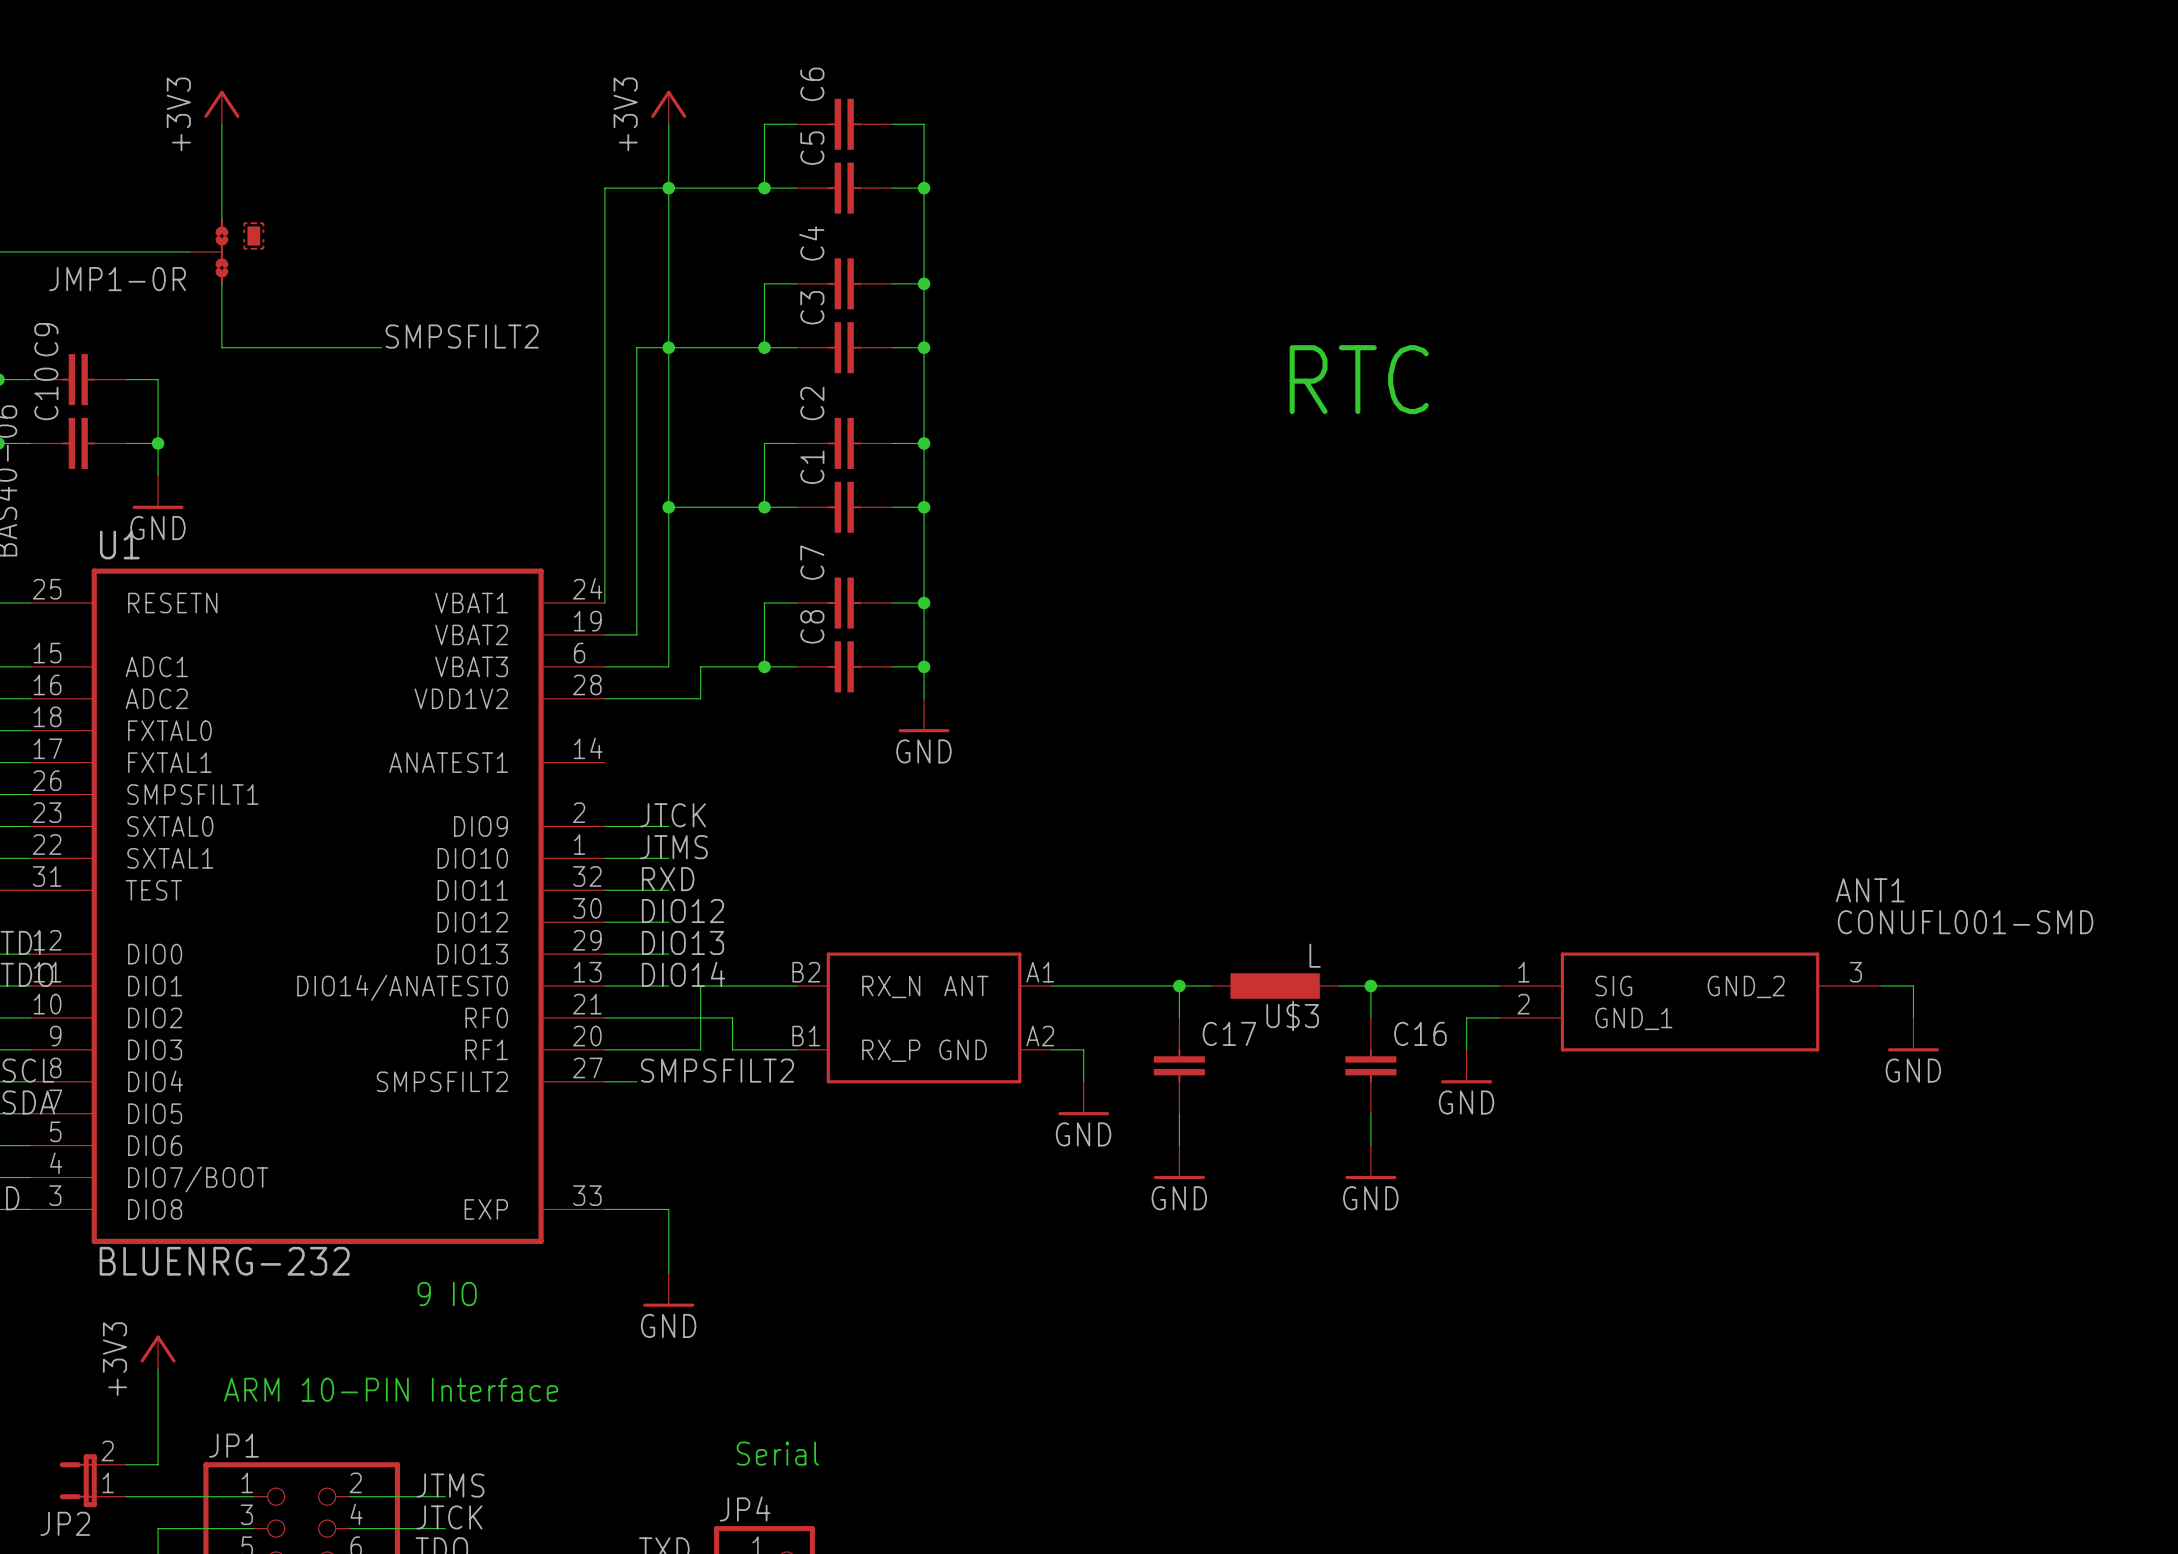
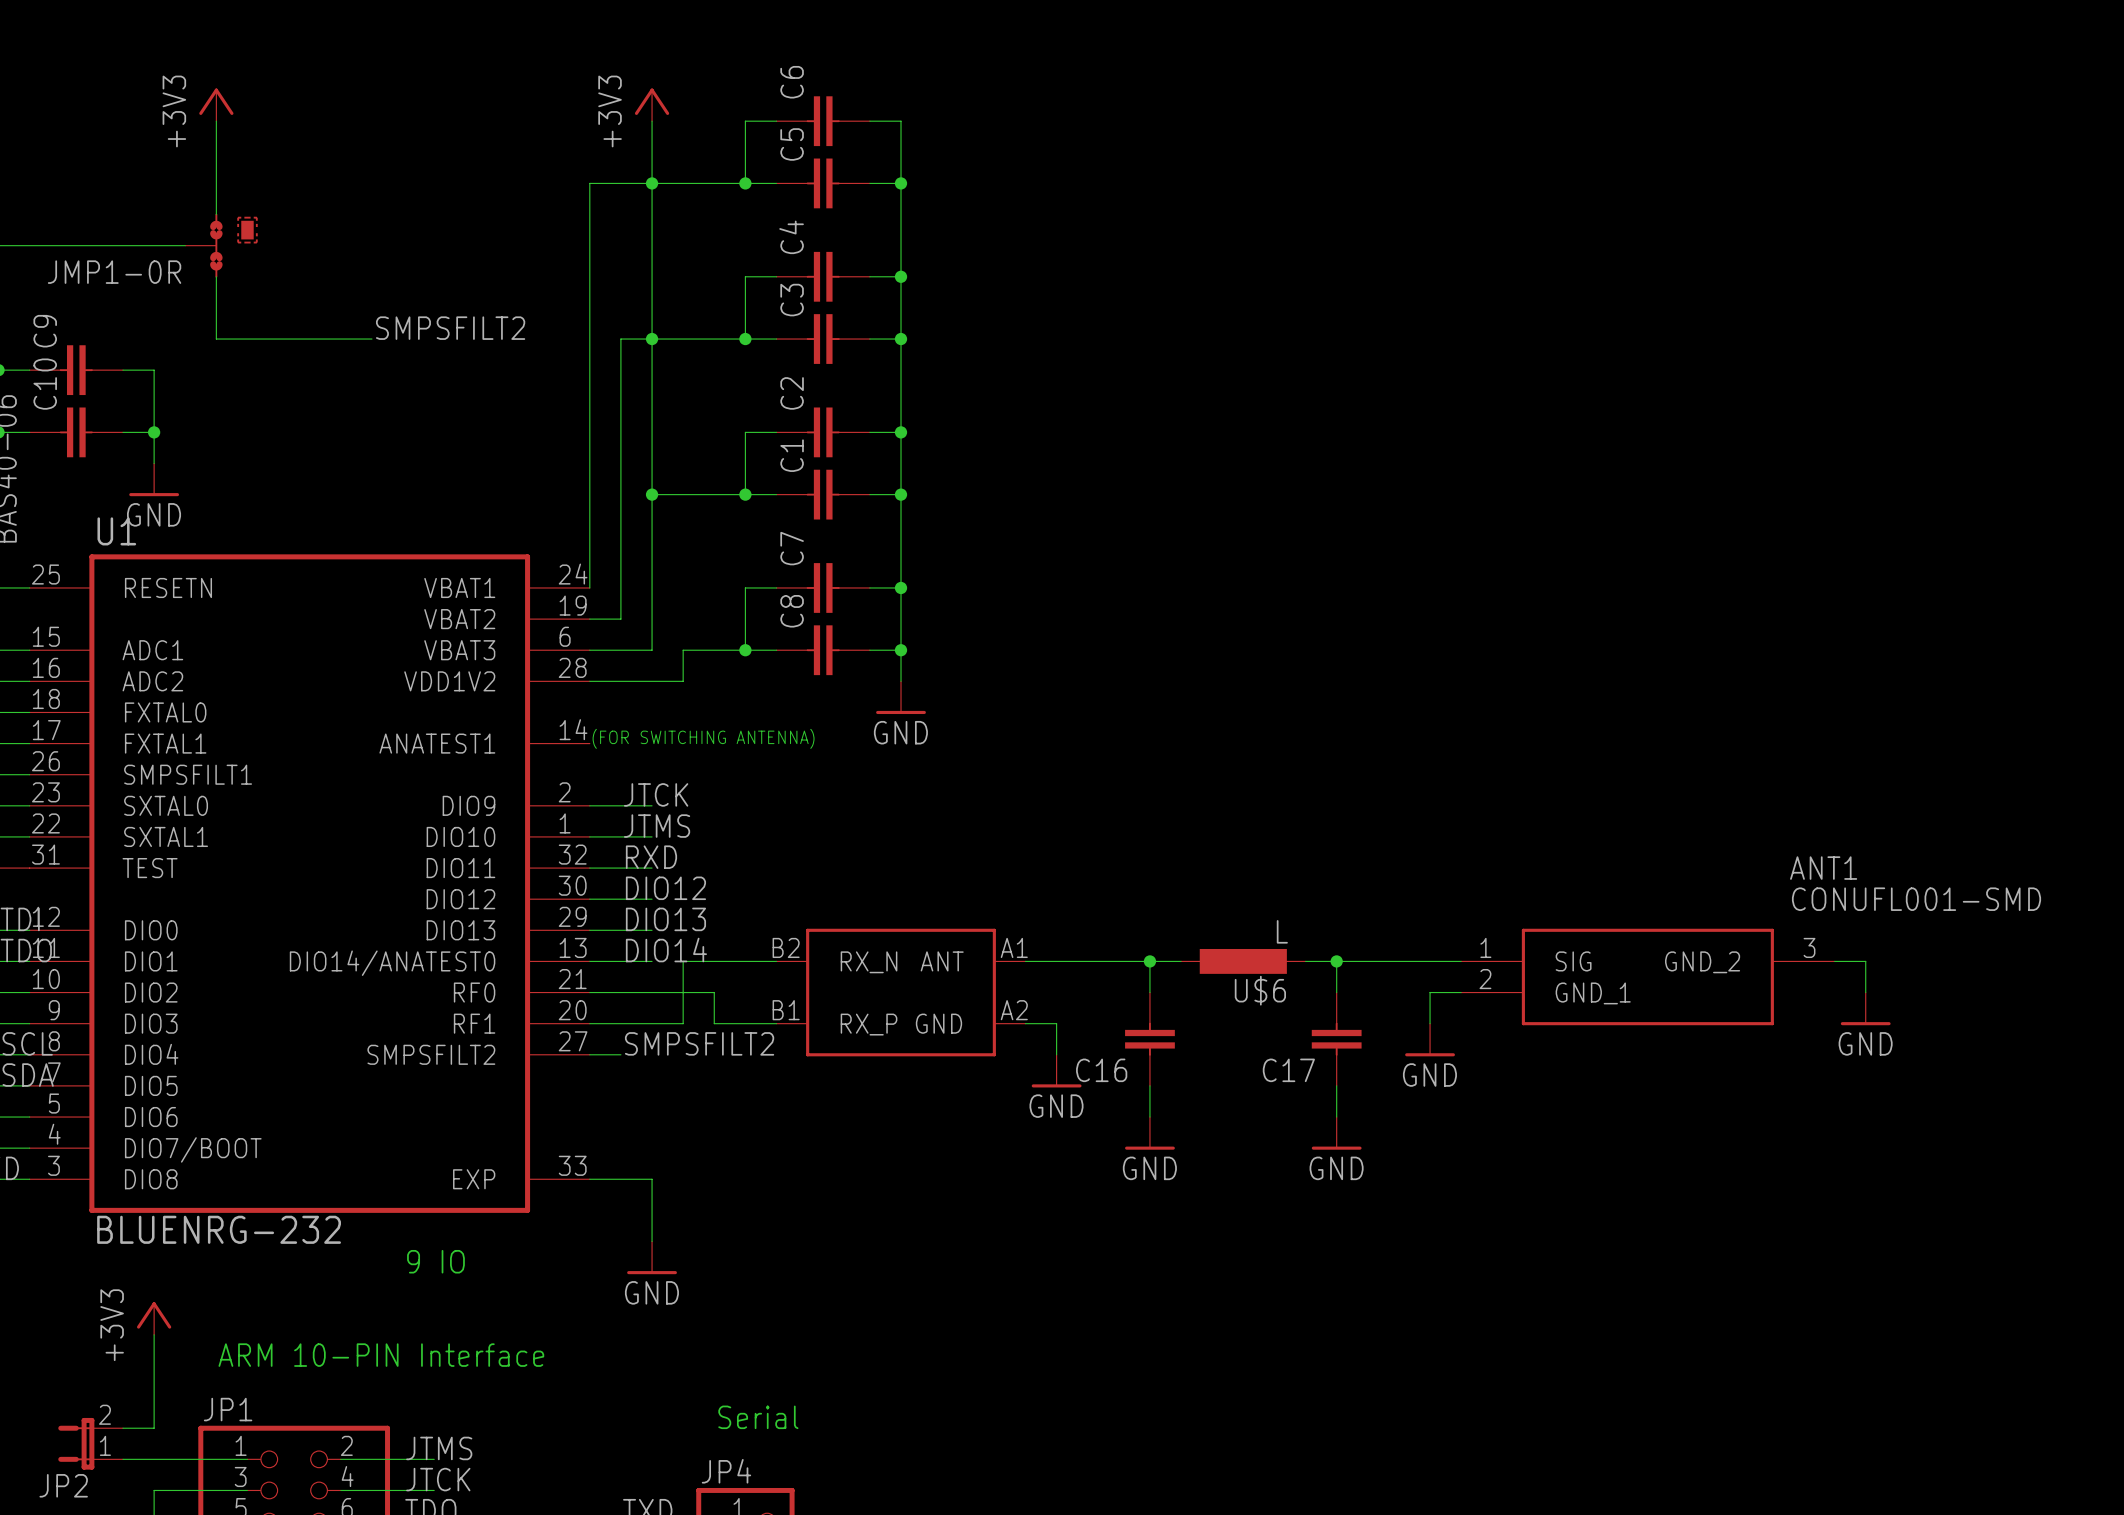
text: RTC (1359, 379) -> none
text: none -> (FOR SWITCHING ANTENNA) (703, 738)
U$3 name: U$3 (1292, 1016) -> U$6 (1260, 990)
C17 name: C17 (1229, 1033) -> C16 (1101, 1070)
C16 name: C16 (1420, 1033) -> C17 (1288, 1070)

